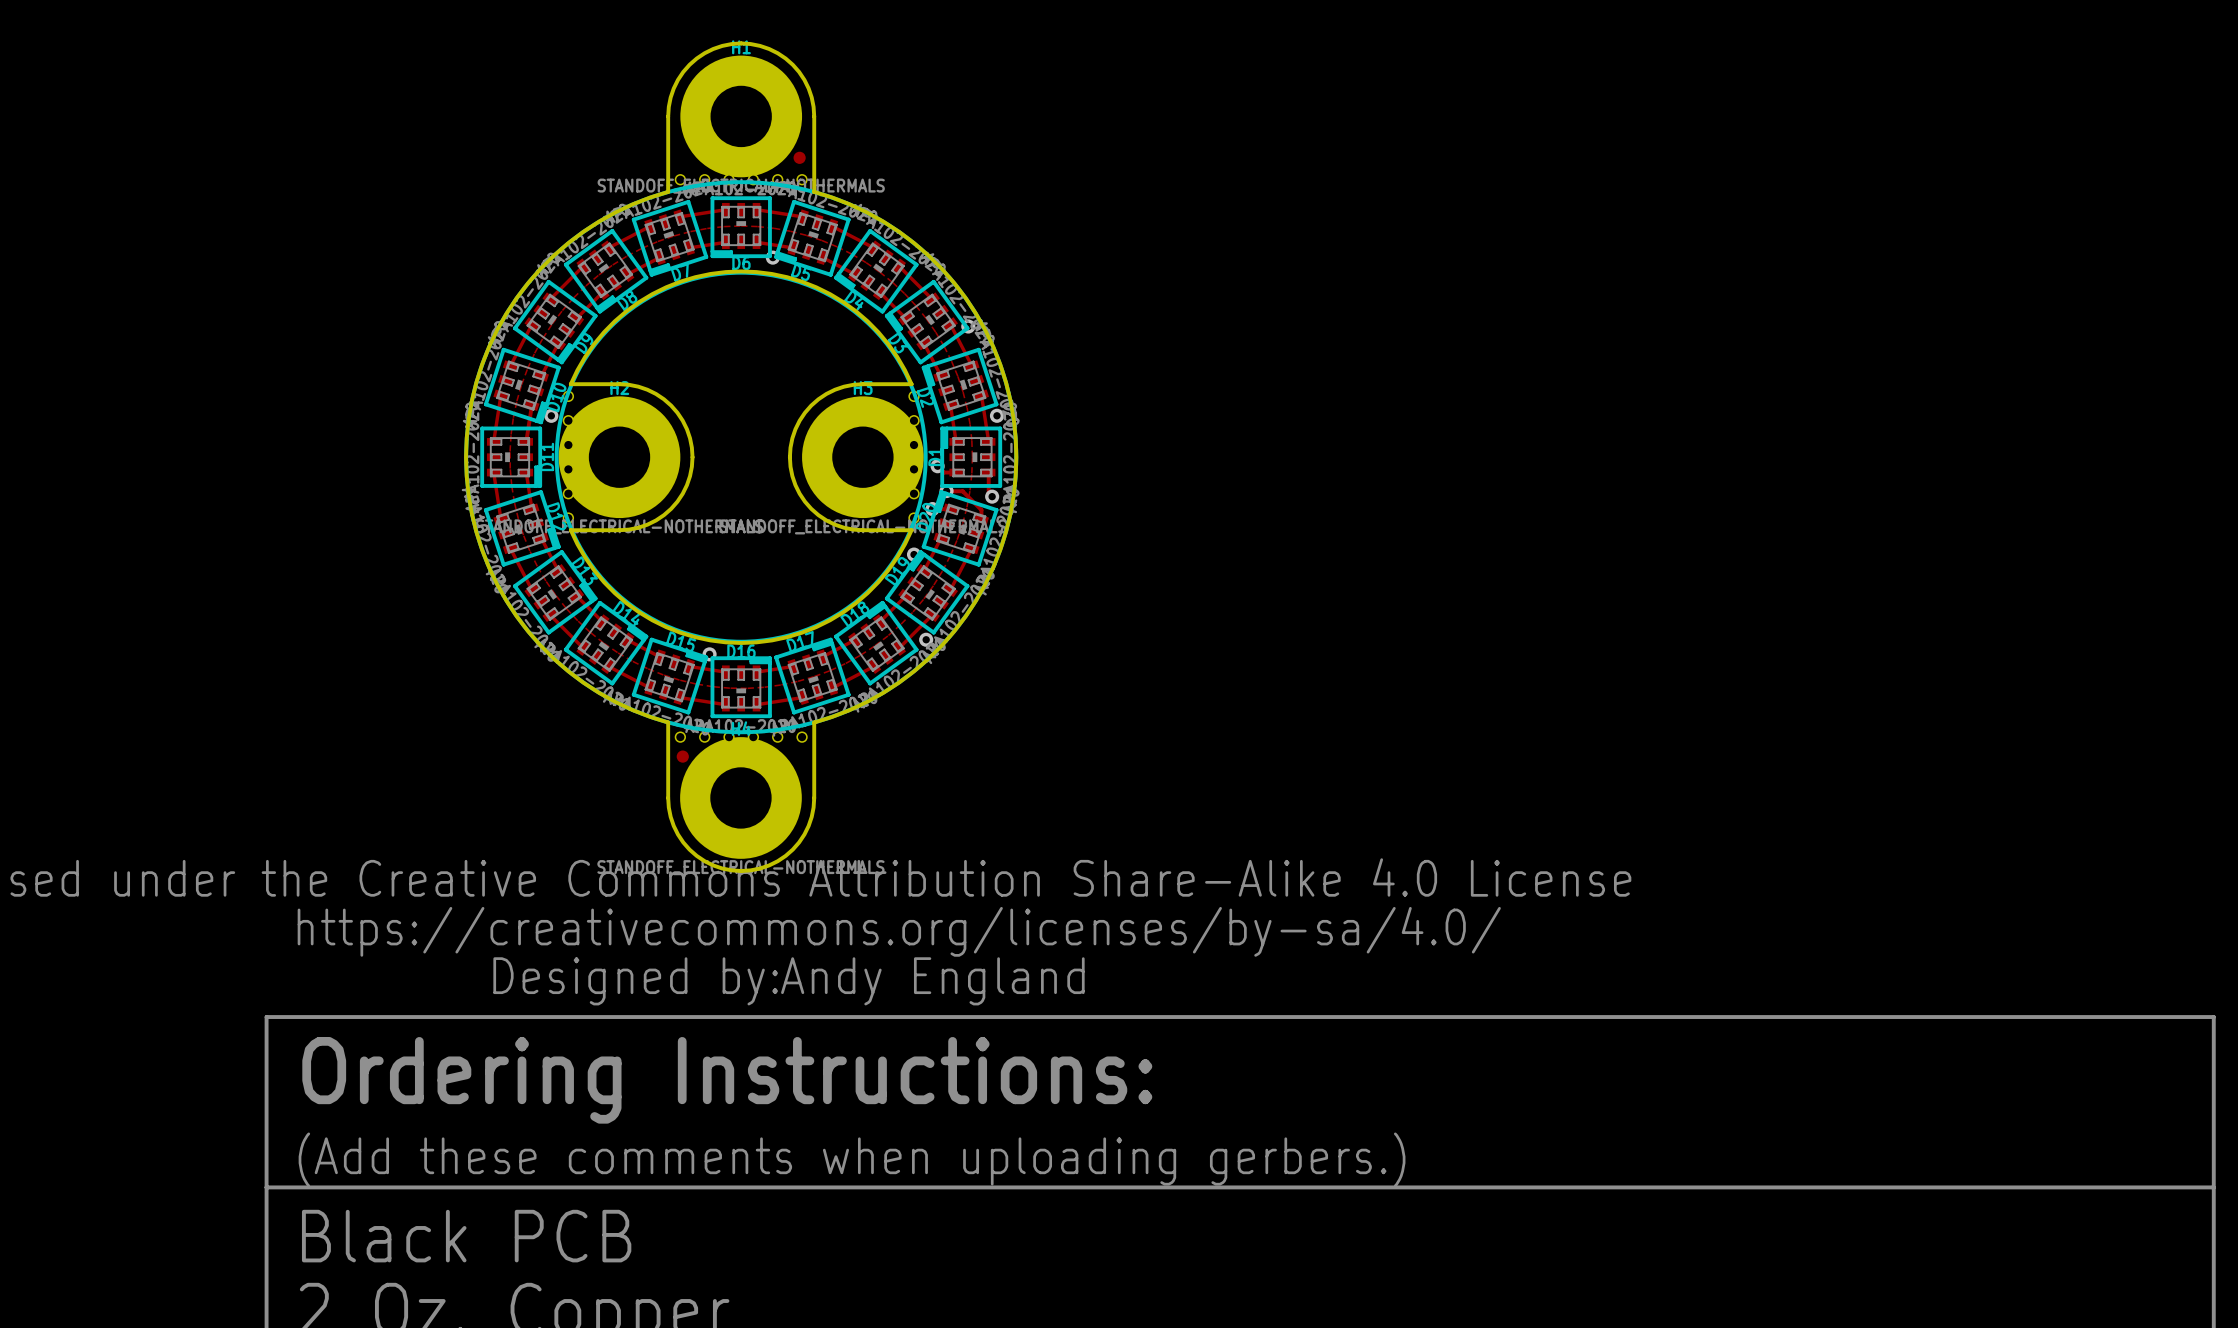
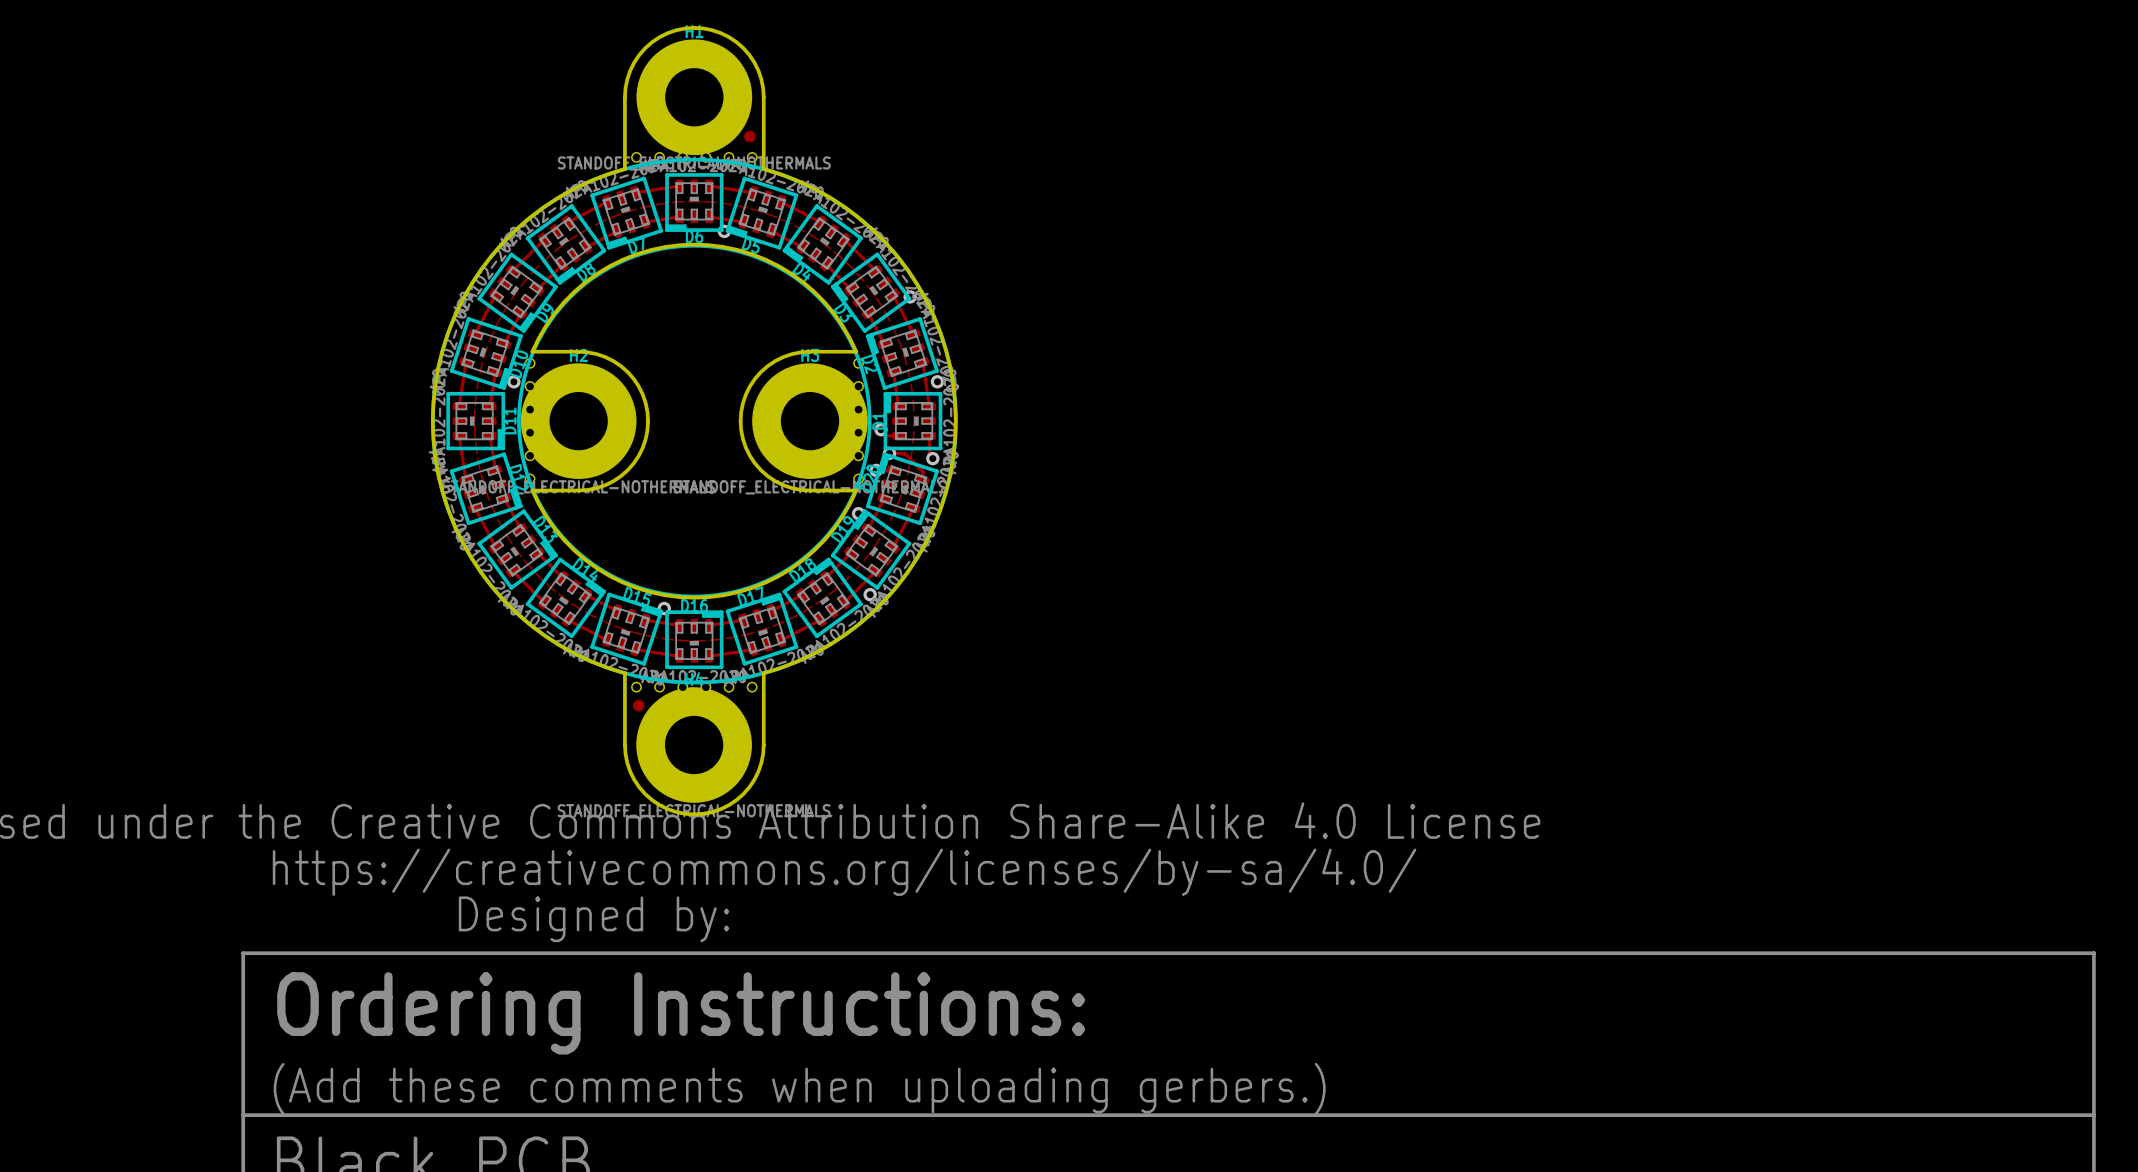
text: Andy England (932, 981) -> none

